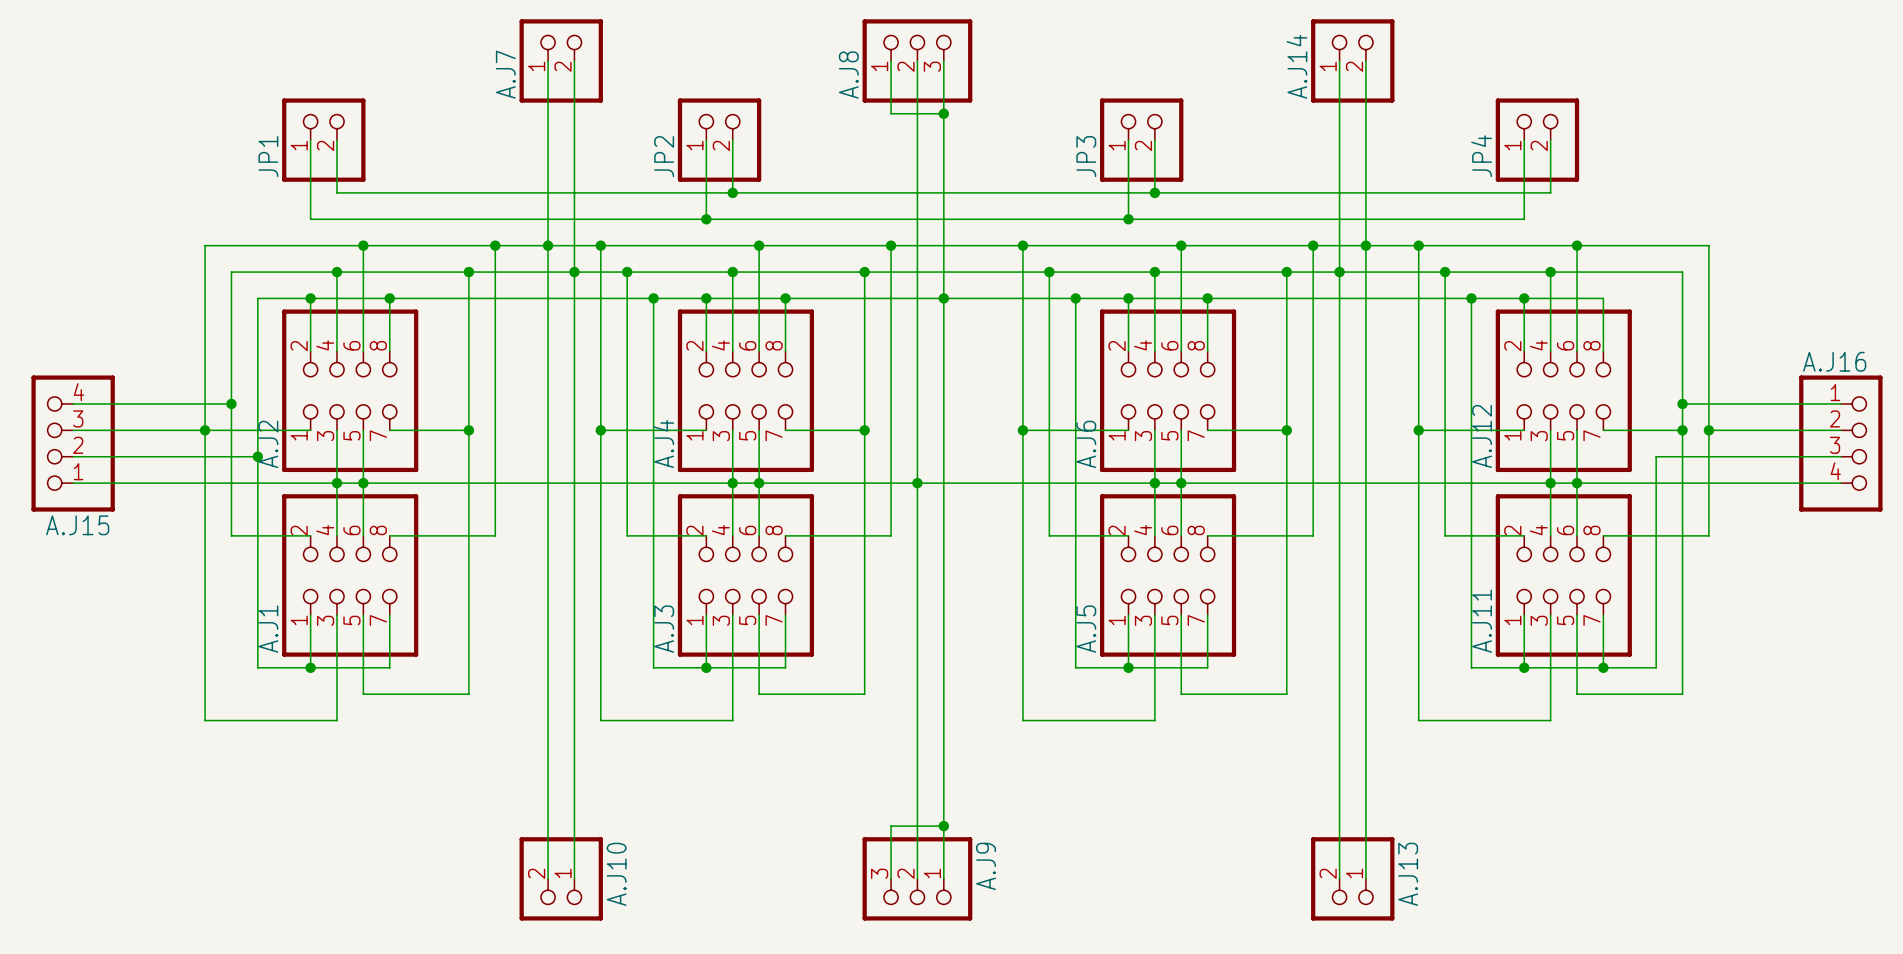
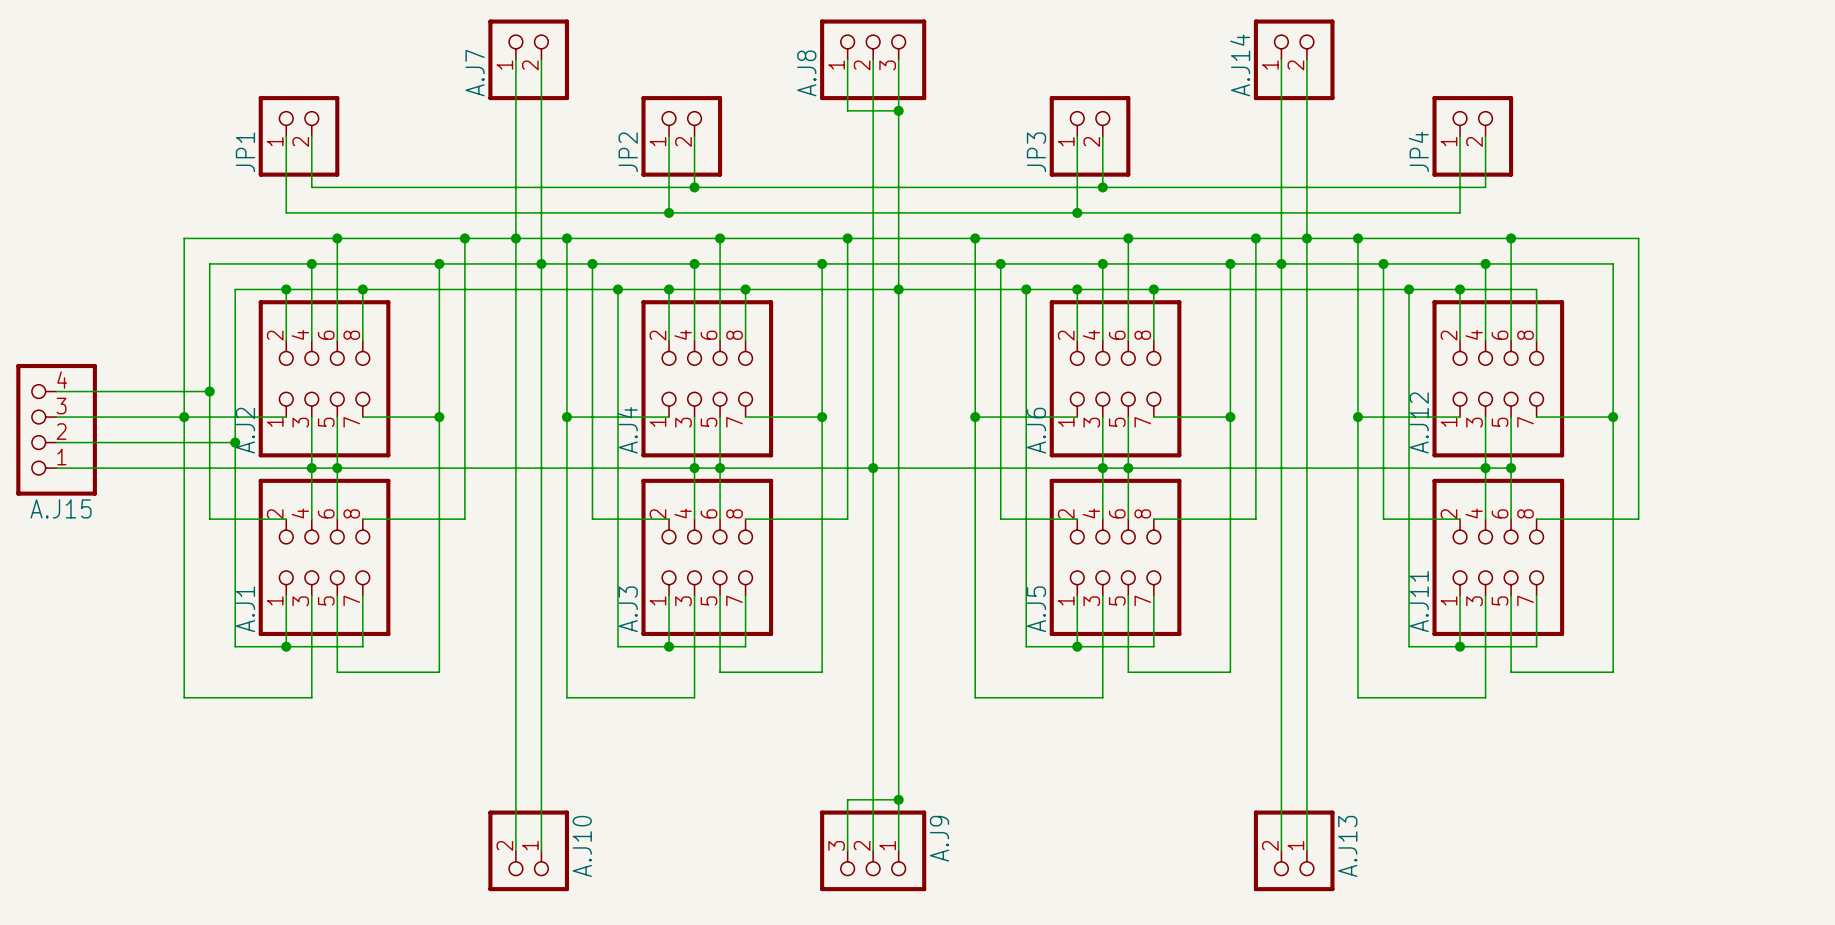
wire: (1682, 403) (1840, 403) -> none
junction: (1682, 403) -> none
wire: (1708, 430) (1840, 430) -> none
junction: (1708, 430) -> none
A.J16: (1840, 443) -> none
wire: (1840, 456) (1656, 456) (1656, 667) (1603, 667) -> none
wire: (1577, 483) (1840, 483) -> none
junction: (1603, 667) -> none

